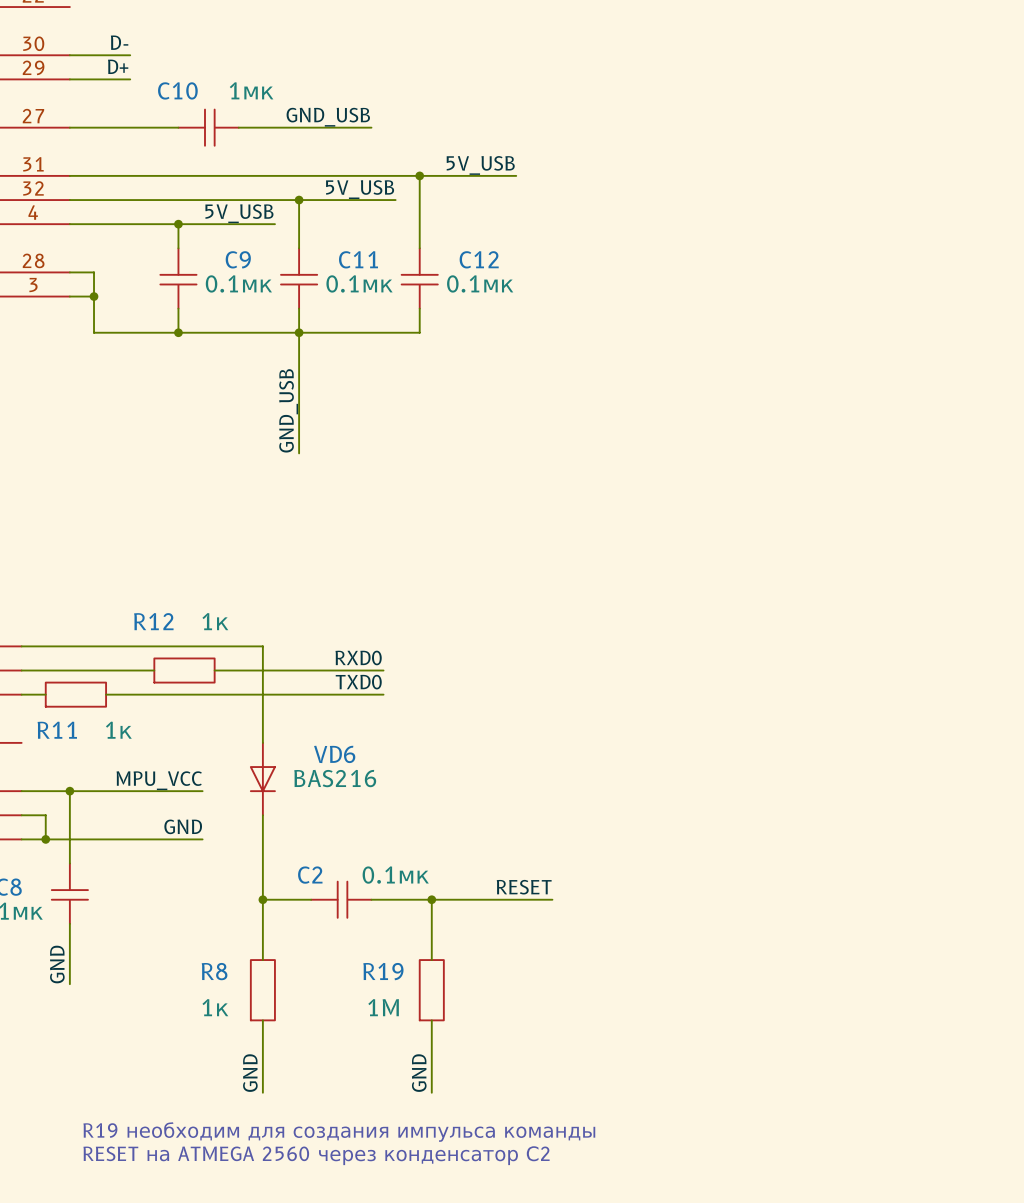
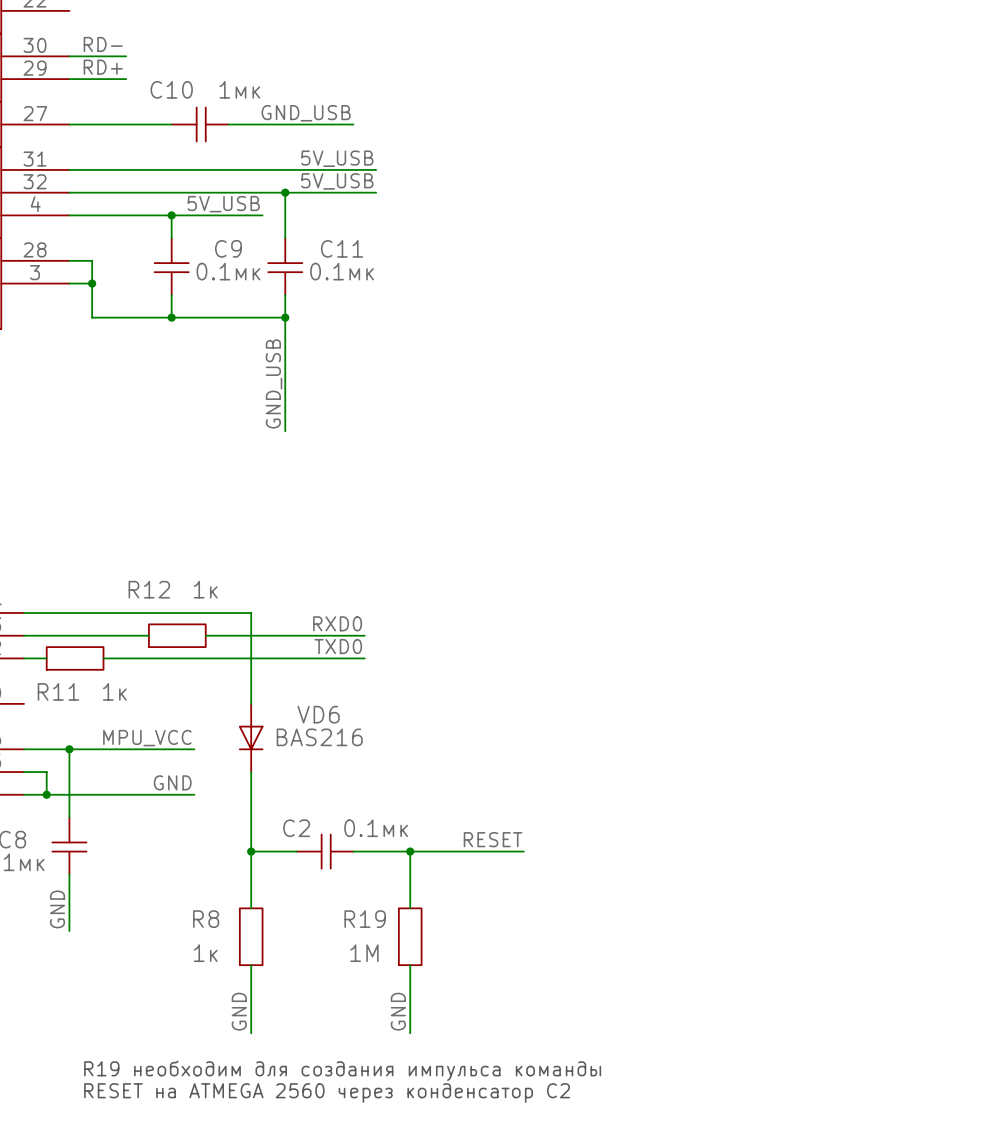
label: D- (119, 42) -> RD- (103, 44)
label: D+ (118, 66) -> RD+ (103, 67)
label position: 5V_USB (480, 165) -> 5V_USB (337, 158)
wire: (395, 175) (516, 175) -> none
wire: (419, 175) (419, 248) -> none
junction: (419, 175) -> none
C12: 0.1мк (419, 278) -> none
wire: (419, 308) (419, 332) (299, 332) -> none

